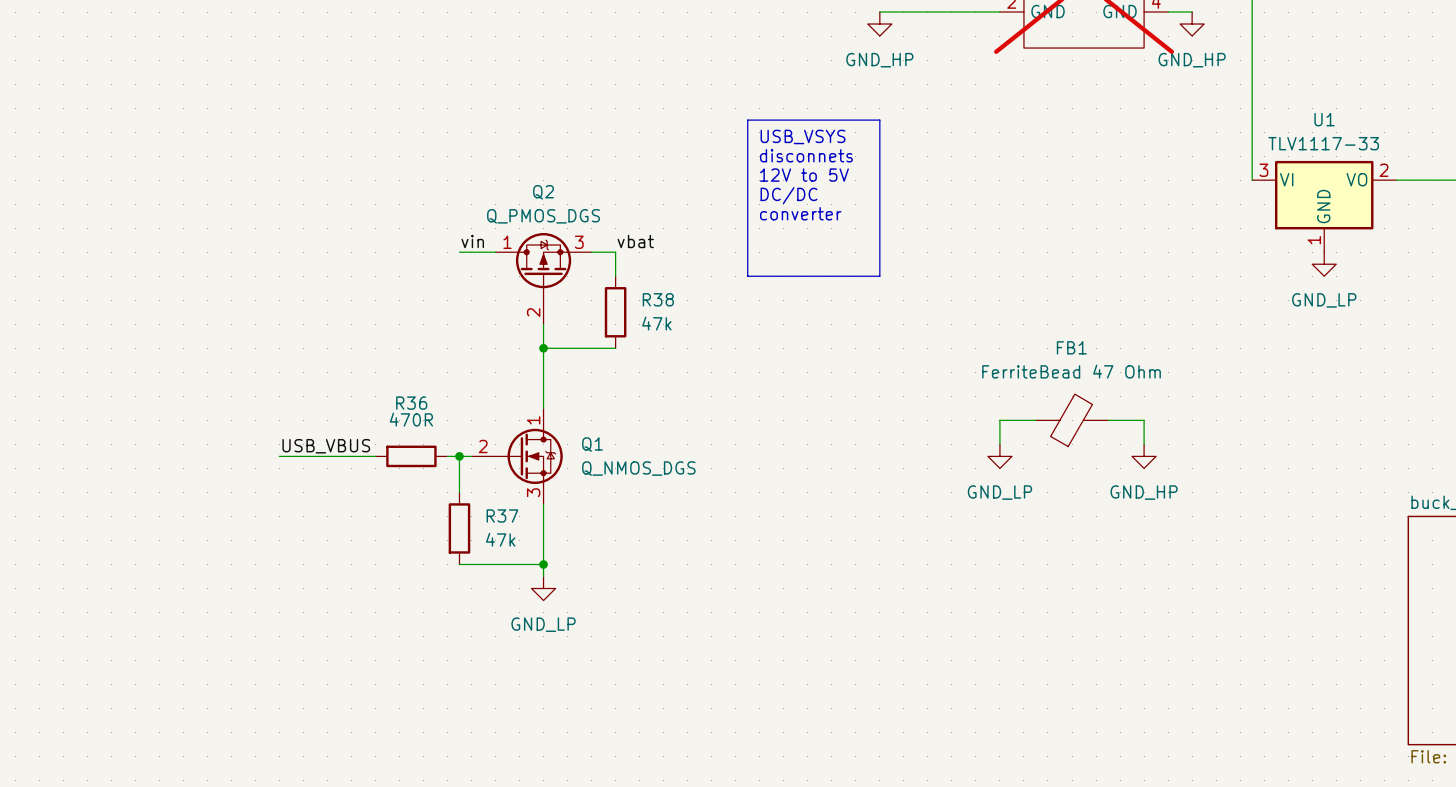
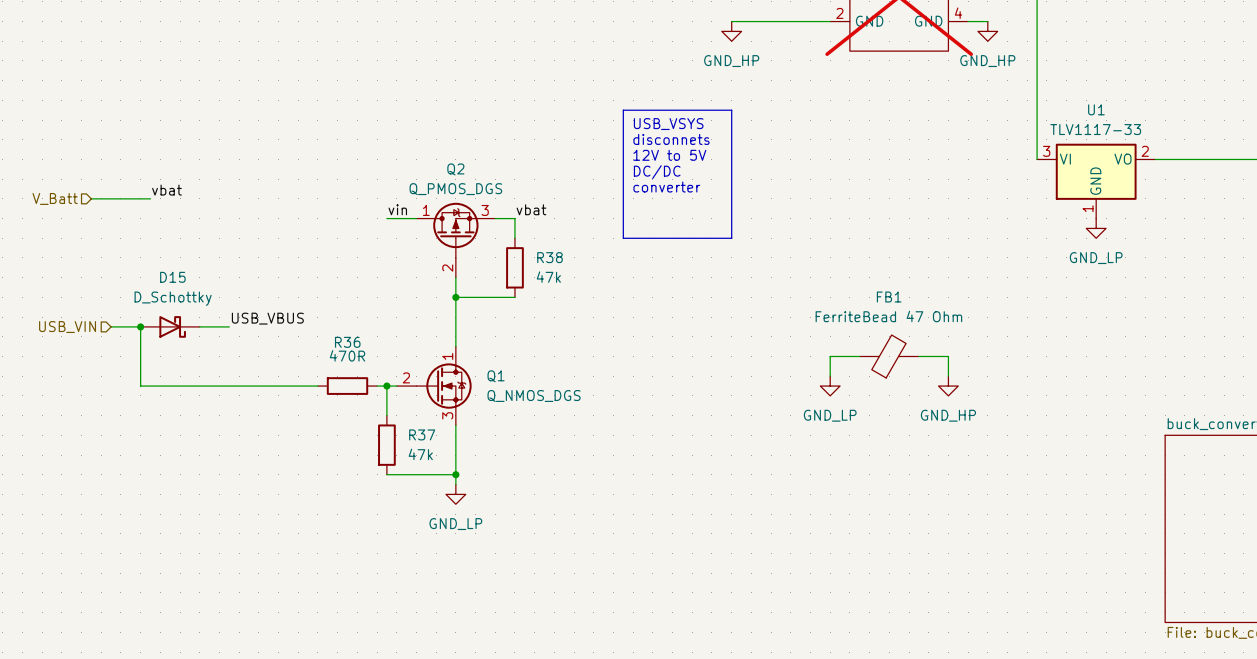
label: none -> vbat (166, 190)
hierarchical label: none -> V_Batt (55, 198)
wire: none -> (91, 198) (150, 198)
hierarchical label: none -> USB_VIN (67, 327)
wire: none -> (111, 326) (140, 326) (140, 386) (239, 386)
junction: none -> (140, 326)
D15: none -> D_Schottky (170, 326)
wire: none -> (199, 326) (229, 326)
label position: USB_VBUS (326, 446) -> USB_VBUS (267, 318)

